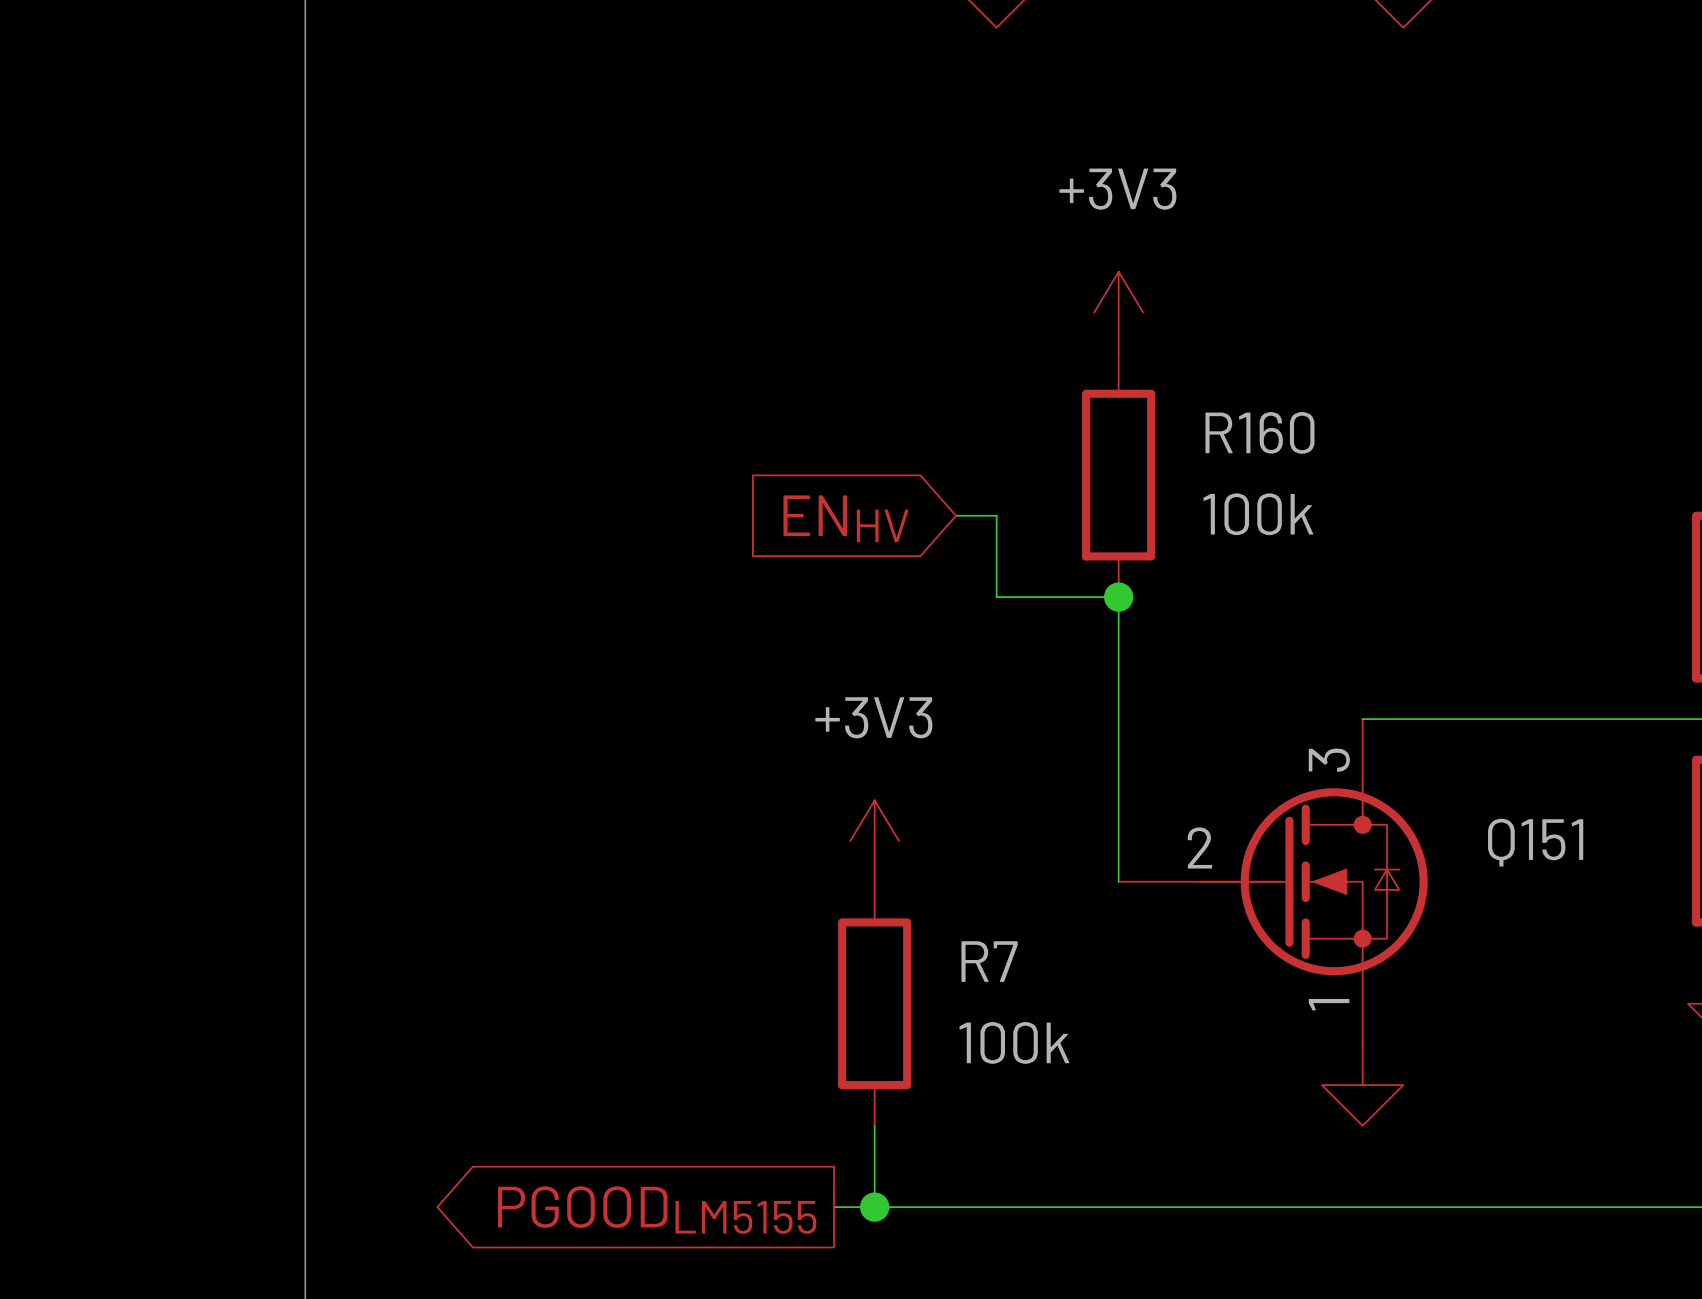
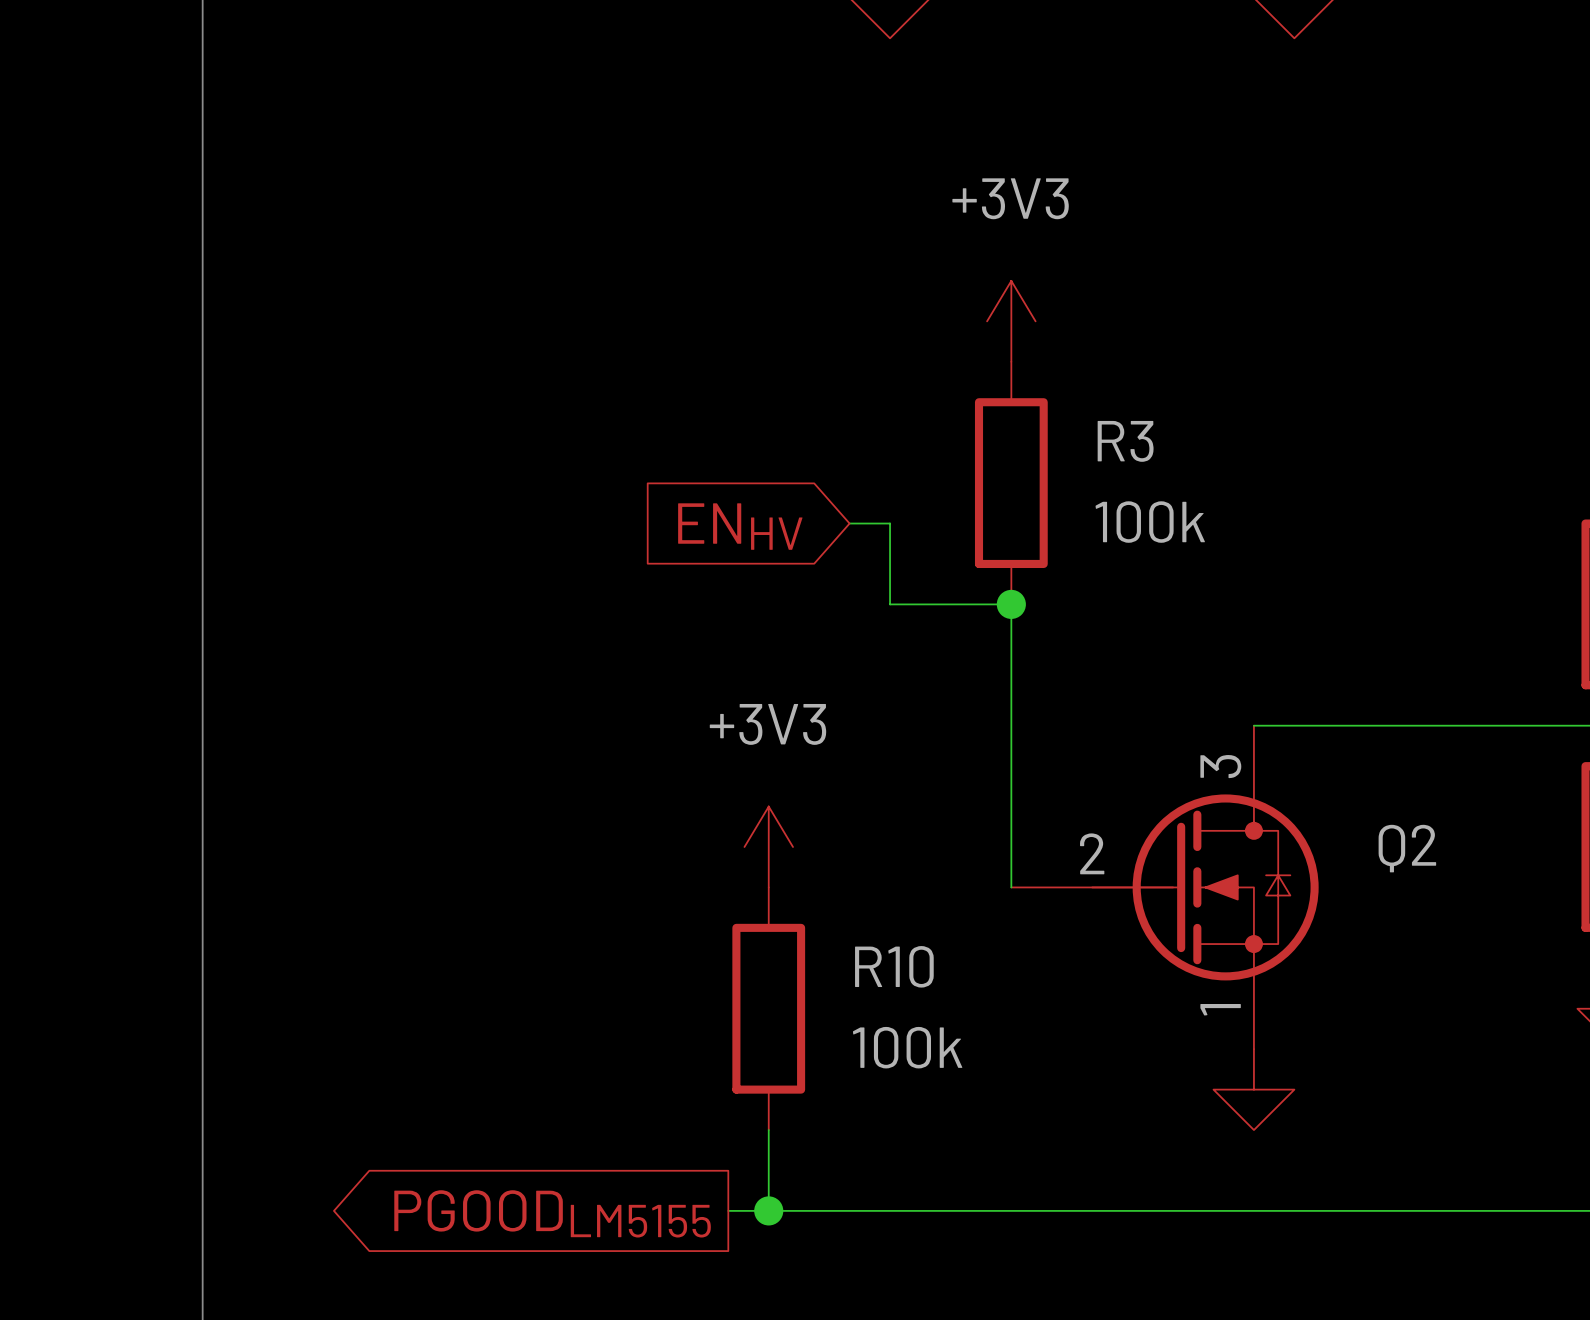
R160 name: R160 (1259, 432) -> R3 (1125, 441)
Q151 name: Q151 (1535, 842) -> Q2 (1407, 848)
R7 name: R7 (989, 961) -> R10 (894, 966)

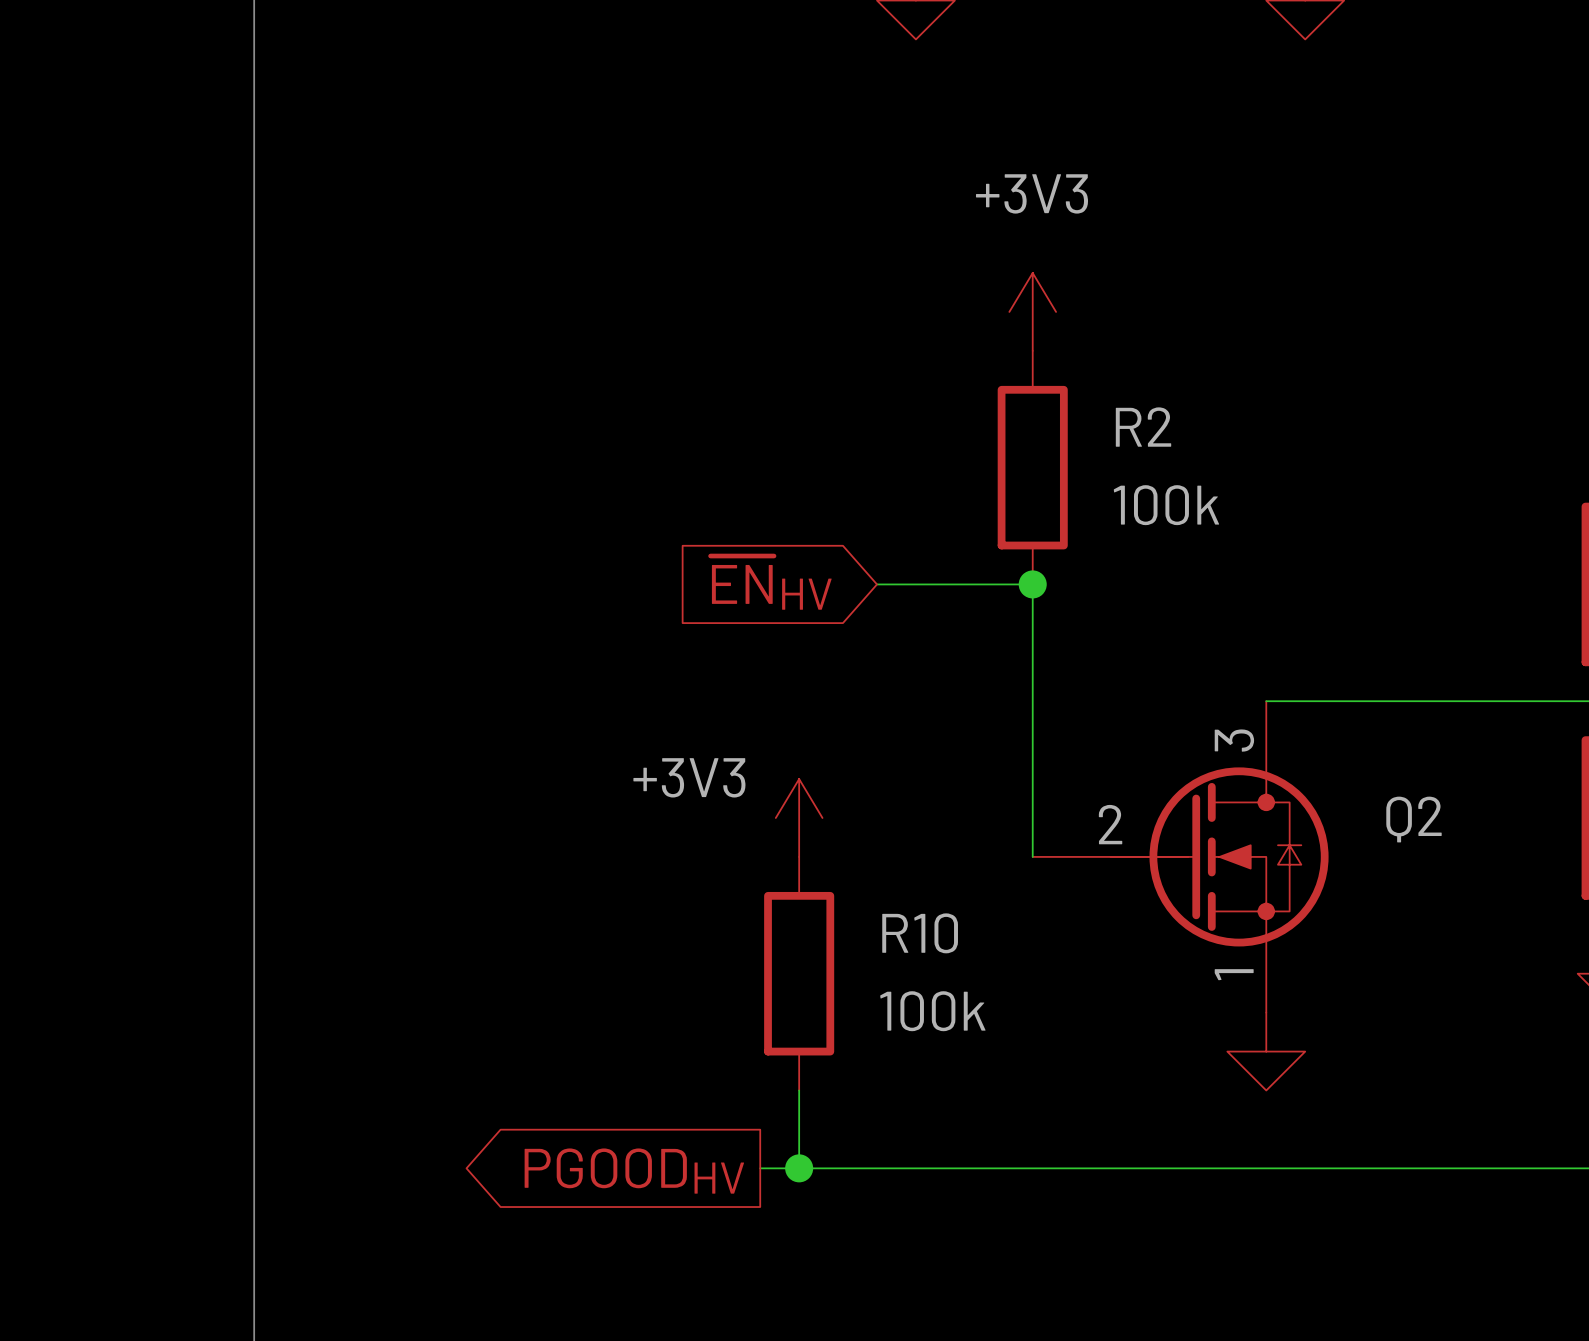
R3 name: R3 (1125, 441) -> R2 (1143, 427)
wire: (849, 523) (890, 523) (890, 604) -> (877, 584) (915, 584)
global label: ENHV (740, 526) -> ~{EN}HV (771, 582)
power symbol text position: +3V3 (767, 724) -> +3V3 (689, 777)
global label: PGOODLM5155 (552, 1213) -> PGOODHV (634, 1171)

